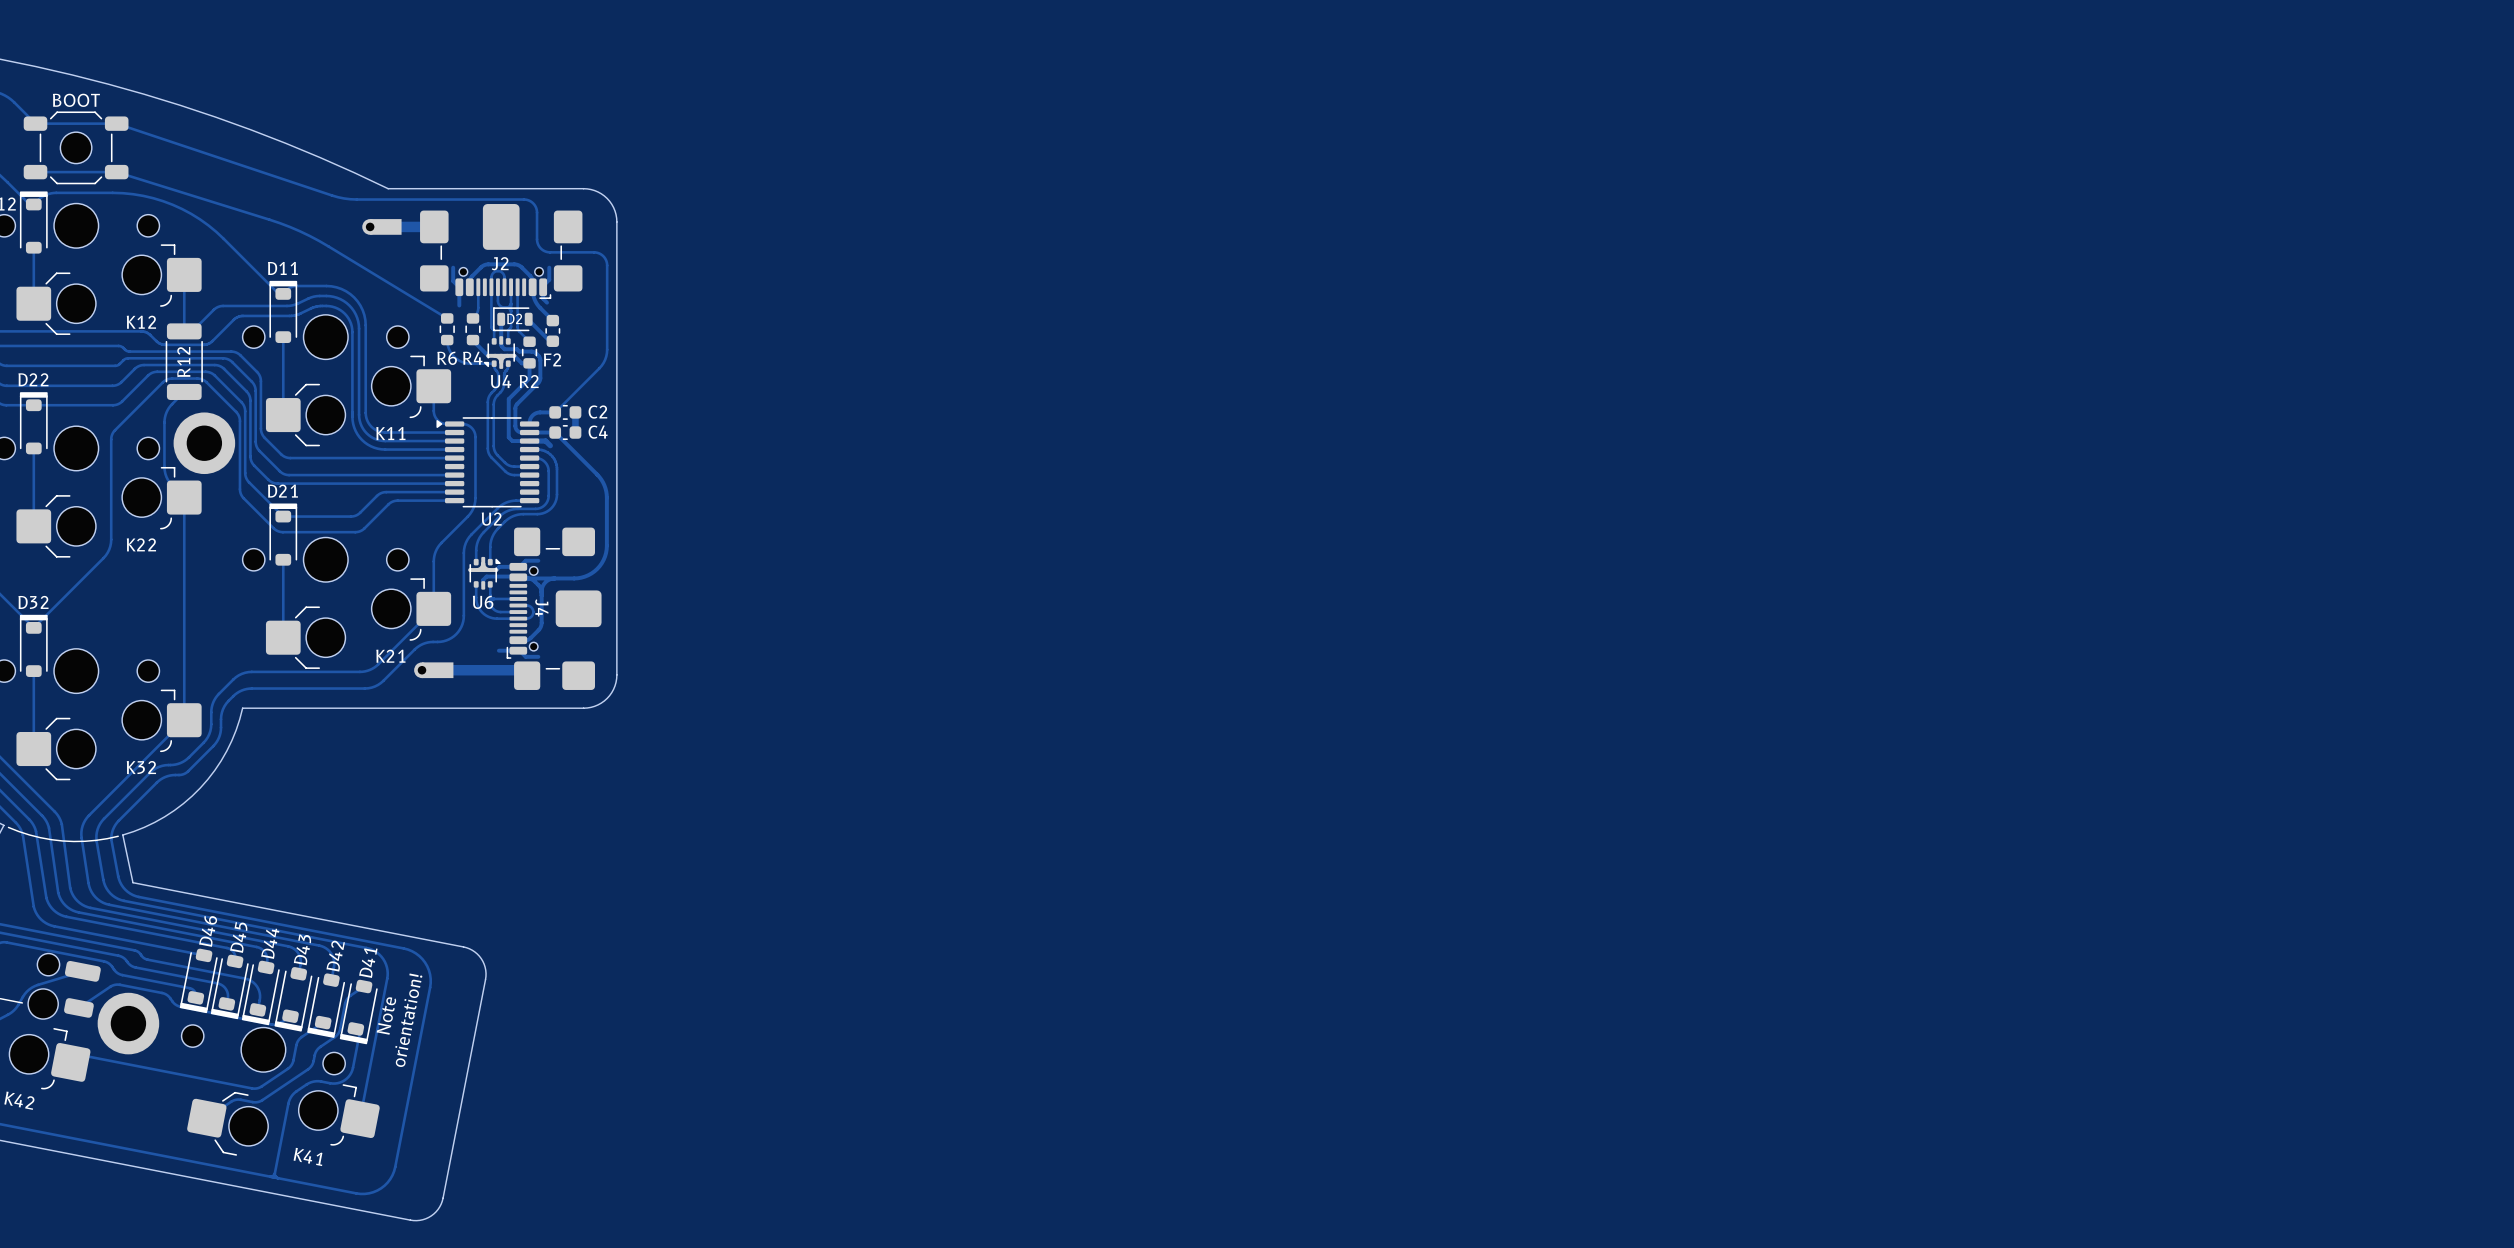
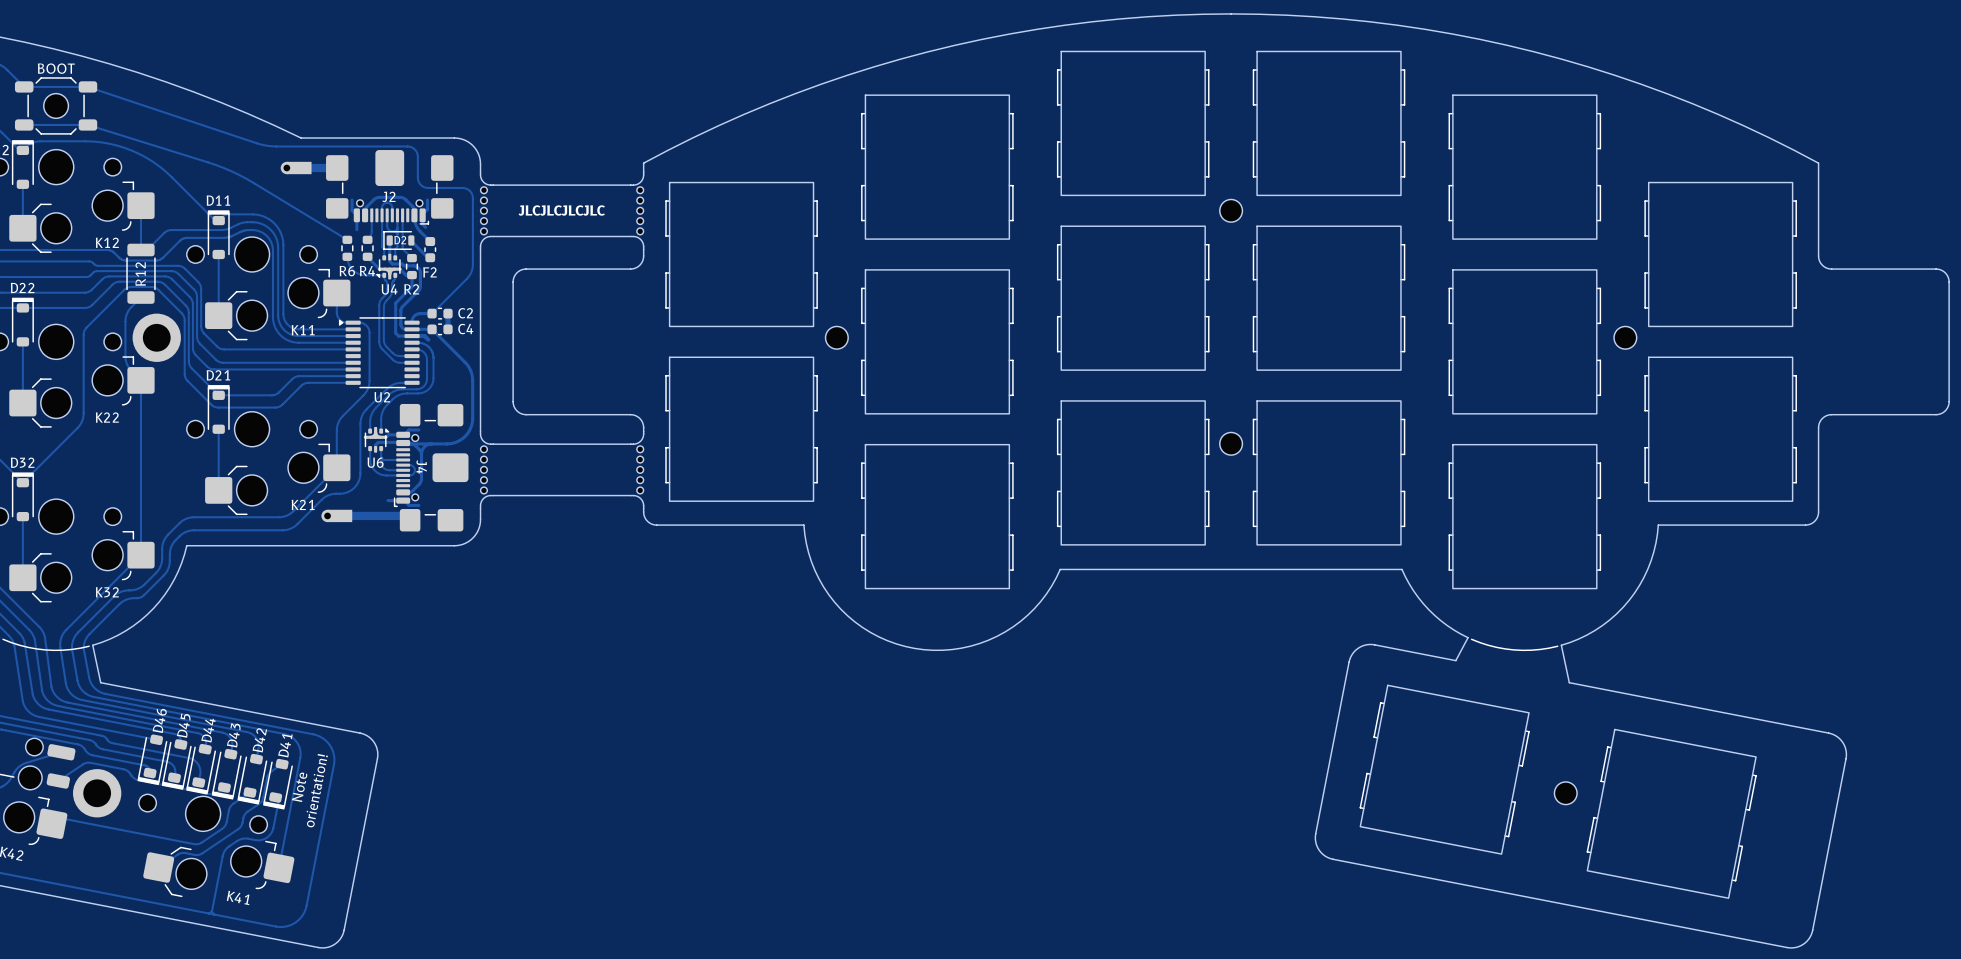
drawing: none -> [1057, 51, 1210, 196]
drawing: none -> [1252, 51, 1406, 196]
drawing: none -> [861, 94, 1014, 240]
drawing: none -> [1448, 94, 1601, 240]
board edge: (616, 232) (616, 330) -> none
board edge: none -> (643, 172) (643, 163) (718, 125) (769, 103) (874, 66) (955, 45) (1064, 25) (1147, 16) (1258, 14) (1342, 18) (1452, 34) (1534, 51) (1614, 75) (1718, 114) (1818, 163) (1818, 256) (1823, 266) (1831, 269) (1937, 269) (1946, 273) (1949, 282) (1949, 401) (1945, 410) (1936, 414) (1831, 414) (1825, 416) (1818, 426) (1818, 512) (1813, 522) (1805, 525) (1658, 525) (1651, 560) (1643, 577) (1628, 600) (1616, 614) (1594, 630) (1561, 645) (1569, 682) (1828, 733) (1841, 740) (1845, 749) (1846, 758) (1812, 930) (1805, 942) (1794, 947) (1333, 859) (1322, 854) (1316, 844) (1315, 833) (1349, 662) (1353, 653) (1362, 645) (1372, 644) (1455, 660) (1468, 637) (1447, 625) (1428, 609) (1413, 590) (1401, 569) (1060, 569) (1046, 594) (1034, 608) (1005, 631) (970, 646) (942, 650) (923, 649) (905, 646) (878, 636) (862, 627) (841, 609) (823, 587) (814, 570) (806, 543) (803, 525) (655, 524) (645, 518) (643, 508)
drawing: none -> [665, 182, 818, 327]
drawing: none -> [1644, 182, 1797, 327]
board edge: none -> (493, 185) (630, 185)
part: none -> (486, 210)
text: none -> JLCJLCJLCJLC (561, 210)
part: none -> (637, 210)
part: none -> (1231, 210)
drawing: none -> [1057, 225, 1210, 371]
drawing: none -> [1252, 225, 1406, 371]
board edge: none -> (493, 236) (630, 236)
board edge: none -> (643, 249) (641, 262) (633, 268) (524, 269) (516, 272) (513, 282) (513, 401) (515, 409) (526, 414) (633, 415) (641, 420) (643, 431)
drawing: none -> [861, 269, 1014, 415]
drawing: none -> [1448, 269, 1601, 415]
part: none -> (836, 337)
part: none -> (1625, 337)
drawing: none -> [665, 357, 818, 502]
drawing: none -> [1644, 357, 1797, 502]
drawing: none -> [1057, 400, 1210, 546]
drawing: none -> [1252, 400, 1406, 546]
board edge: (616, 562) (616, 660) -> none
board edge: none -> (493, 444) (630, 444)
part: none -> (1231, 443)
drawing: none -> [861, 444, 1014, 589]
drawing: none -> [1448, 444, 1601, 589]
part: none -> (486, 469)
part: none -> (637, 469)
board edge: none -> (493, 495) (630, 495)
line: none -> (1471, 639) (1488, 645) (1514, 649) (1540, 649) (1557, 646)
drawing: none -> [1359, 685, 1530, 855]
drawing: none -> [1586, 729, 1757, 899]
part: none -> (1565, 793)

